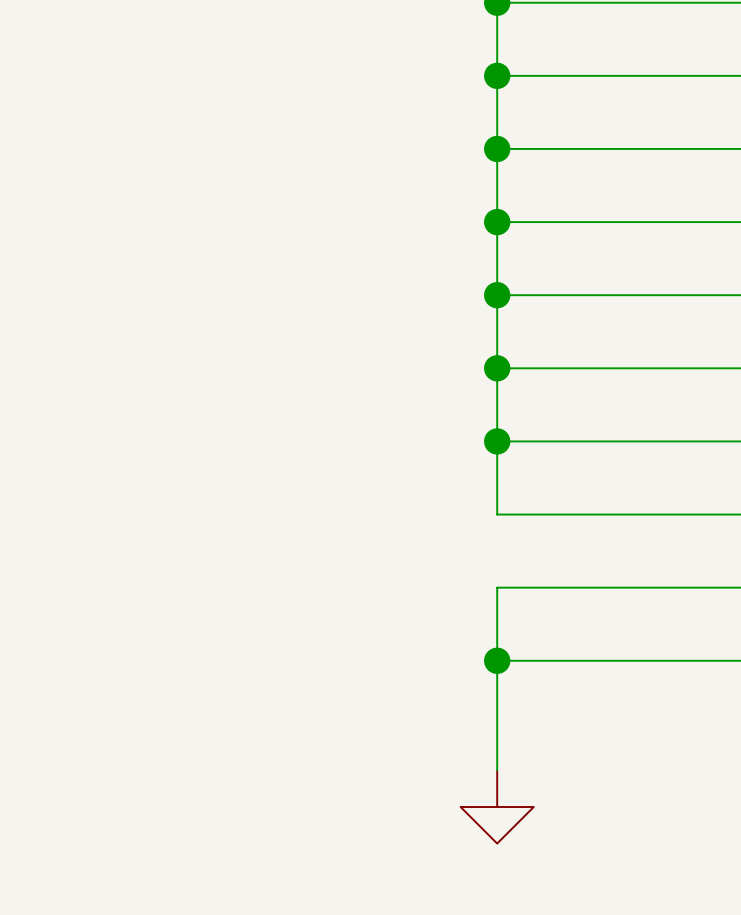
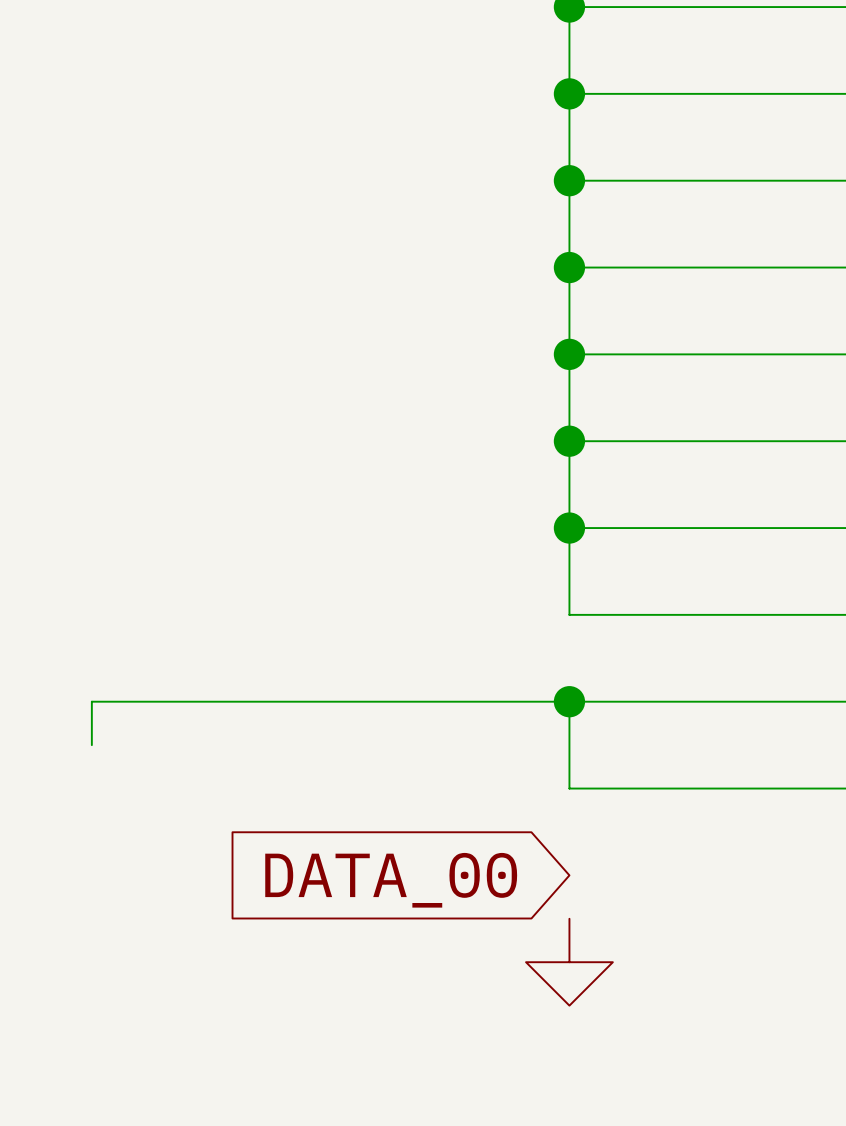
wire: none -> (569, 701) (91, 701) (91, 745)
wire: (497, 660) (497, 770) -> none
junction position: (497, 660) -> (569, 701)
global label: none -> DATA_00 (391, 880)

